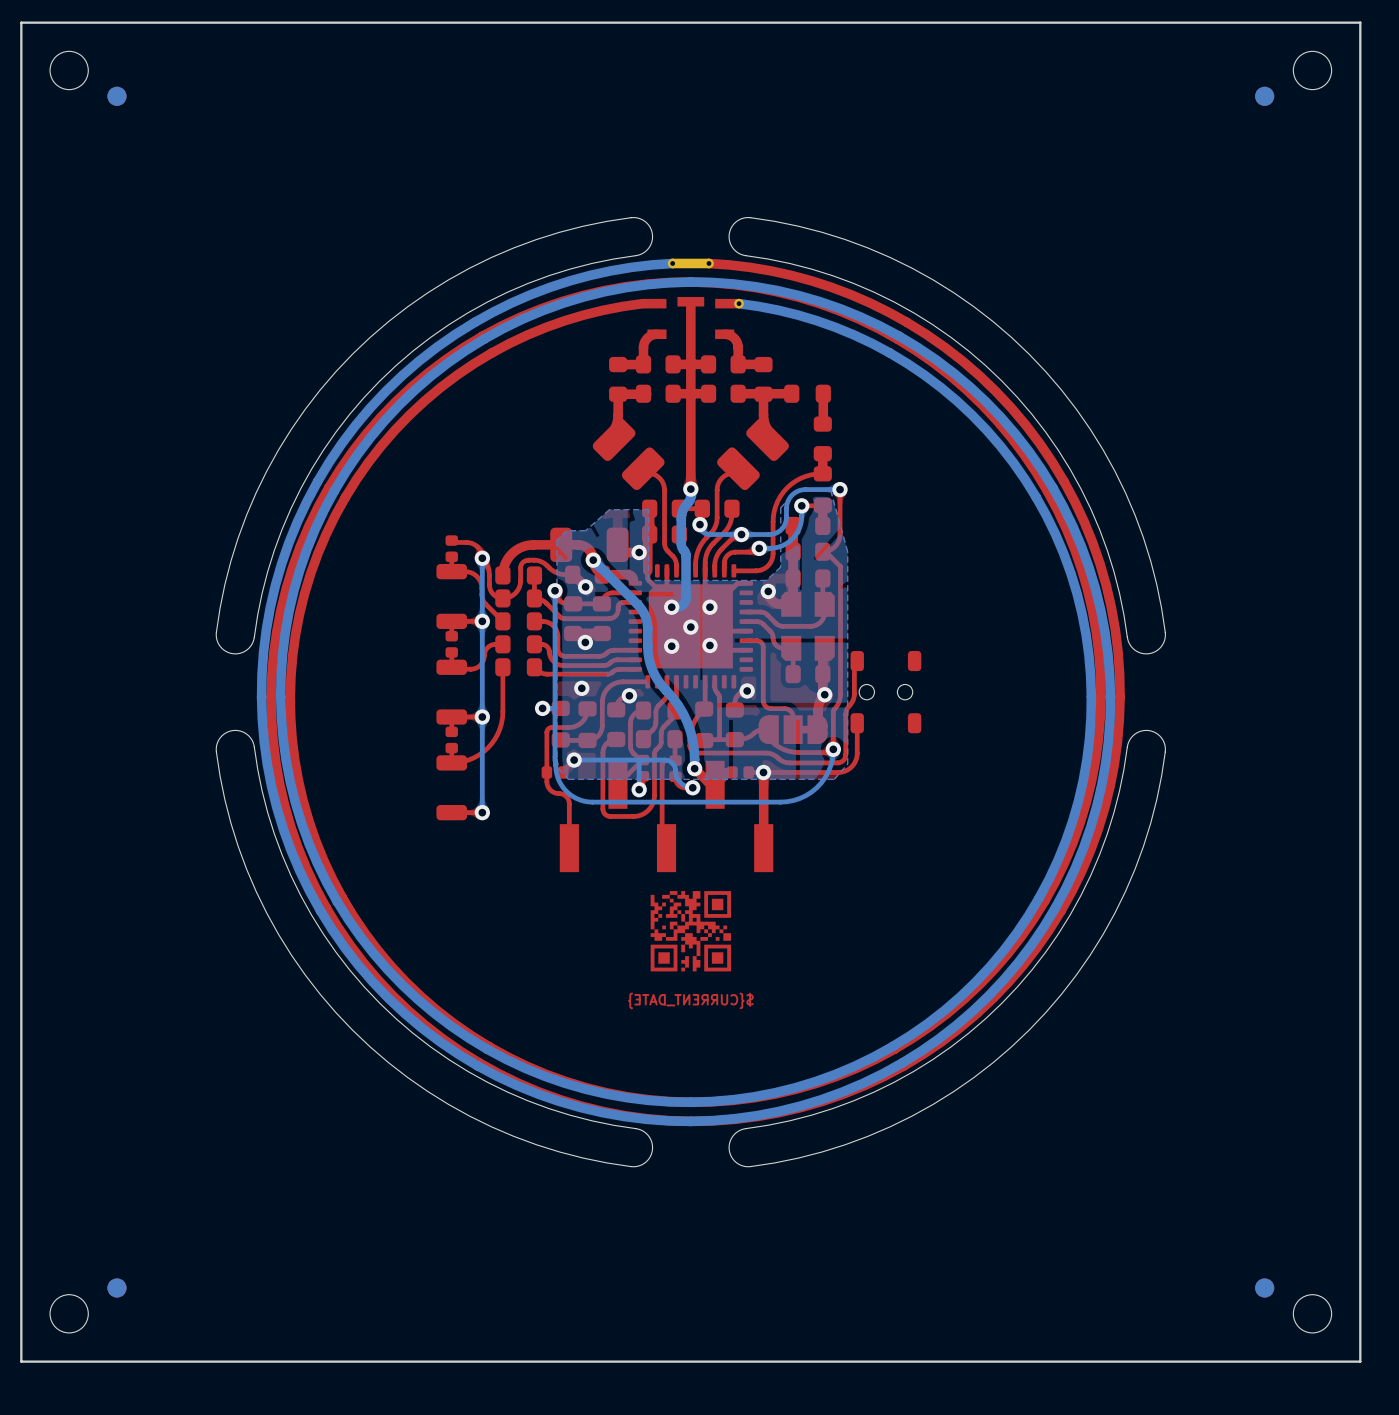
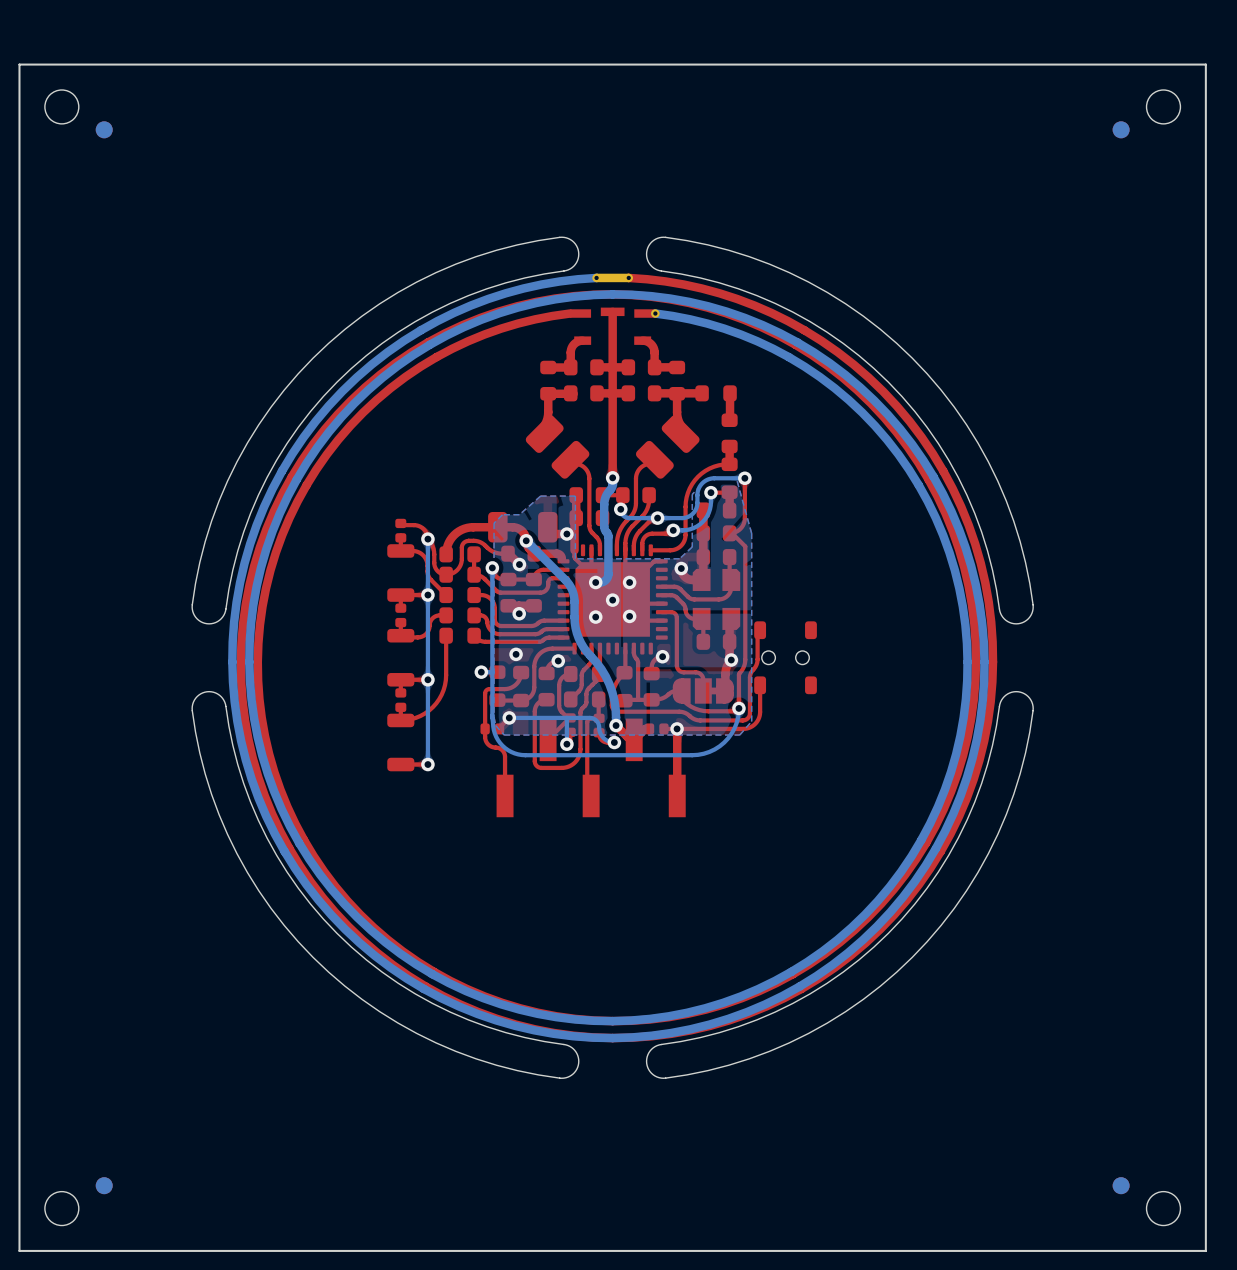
part: (690, 931) -> none

